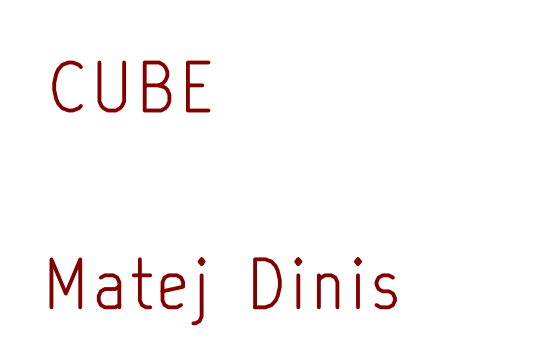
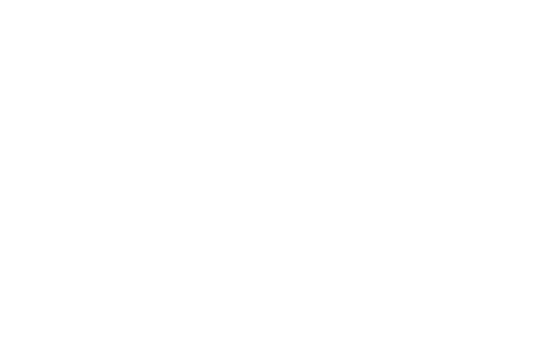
text: CUBE (131, 86) -> none
text: Matej Dinis (223, 291) -> none

